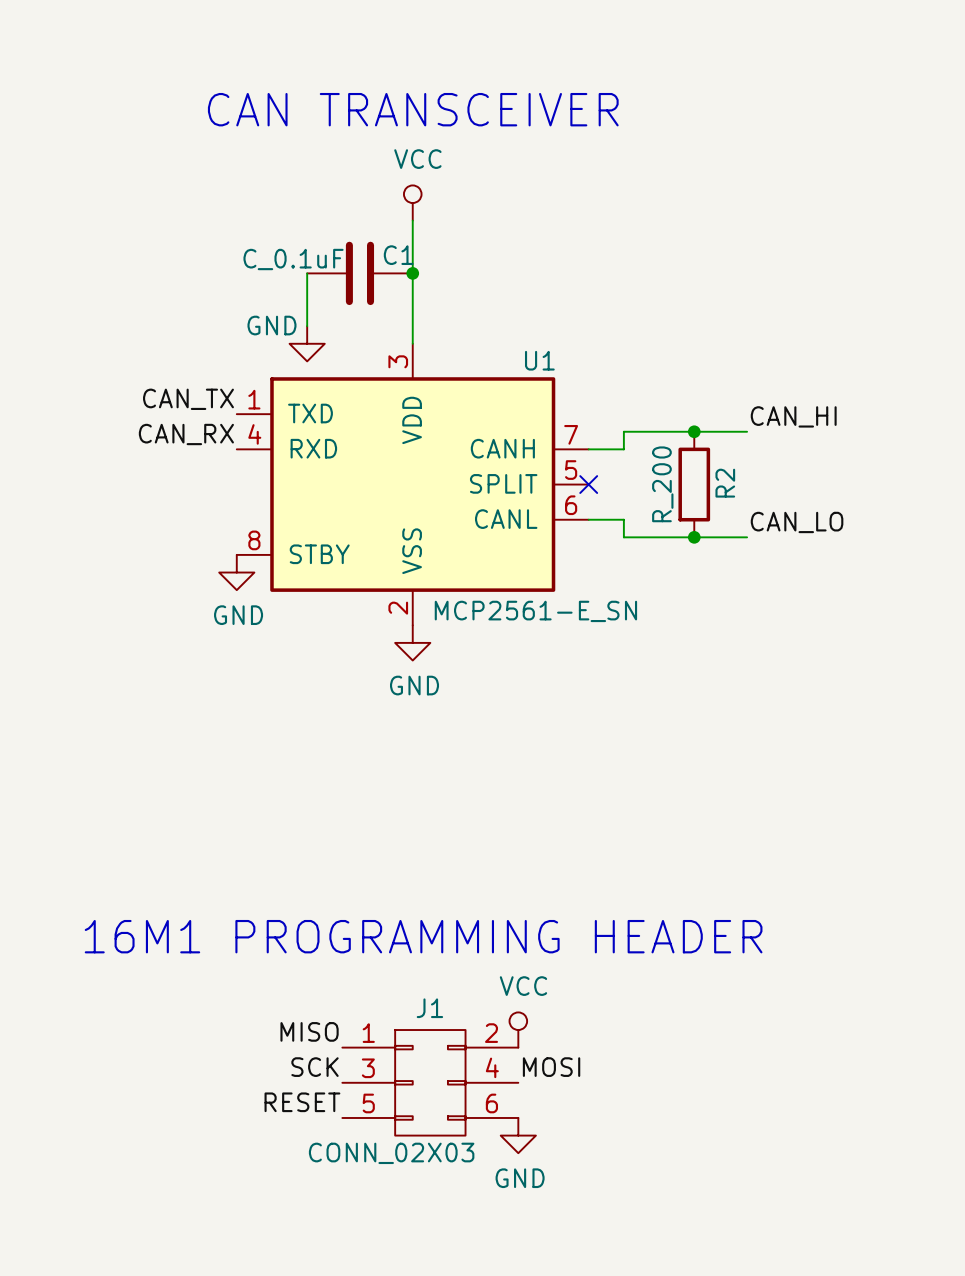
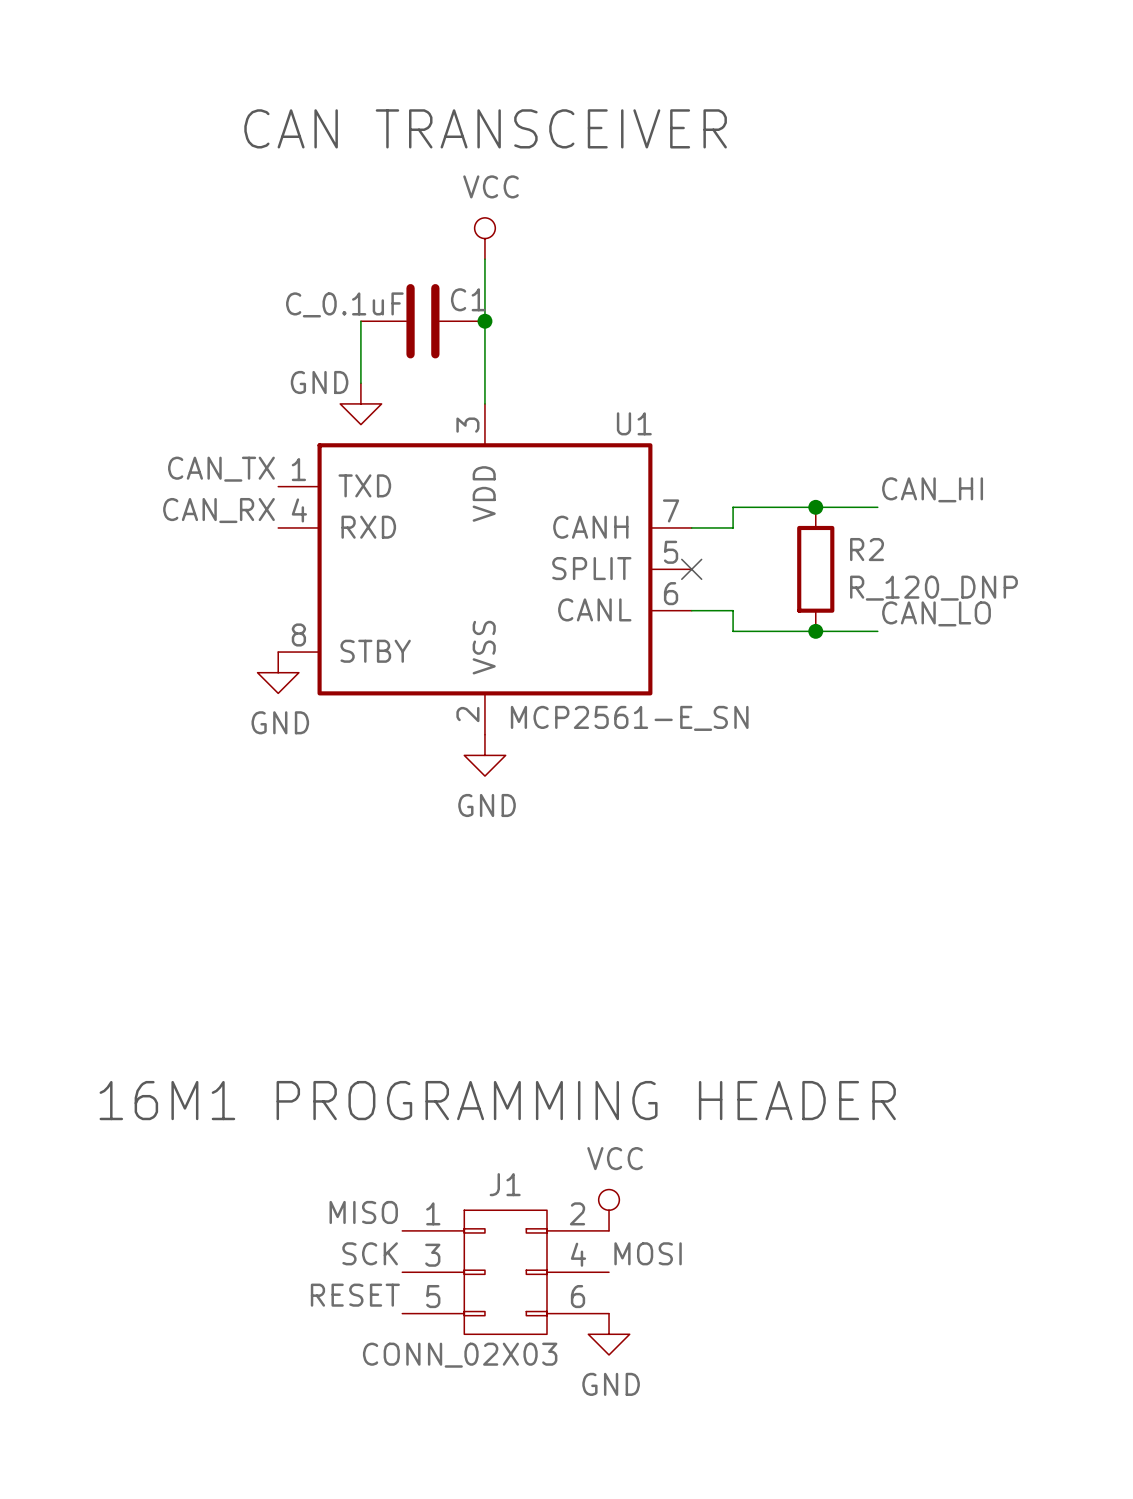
R2 name rotation: 0° (725, 483) -> 90° clockwise (867, 549)
R2 value: R_200 (662, 484) -> R_120_DNP (933, 588)

